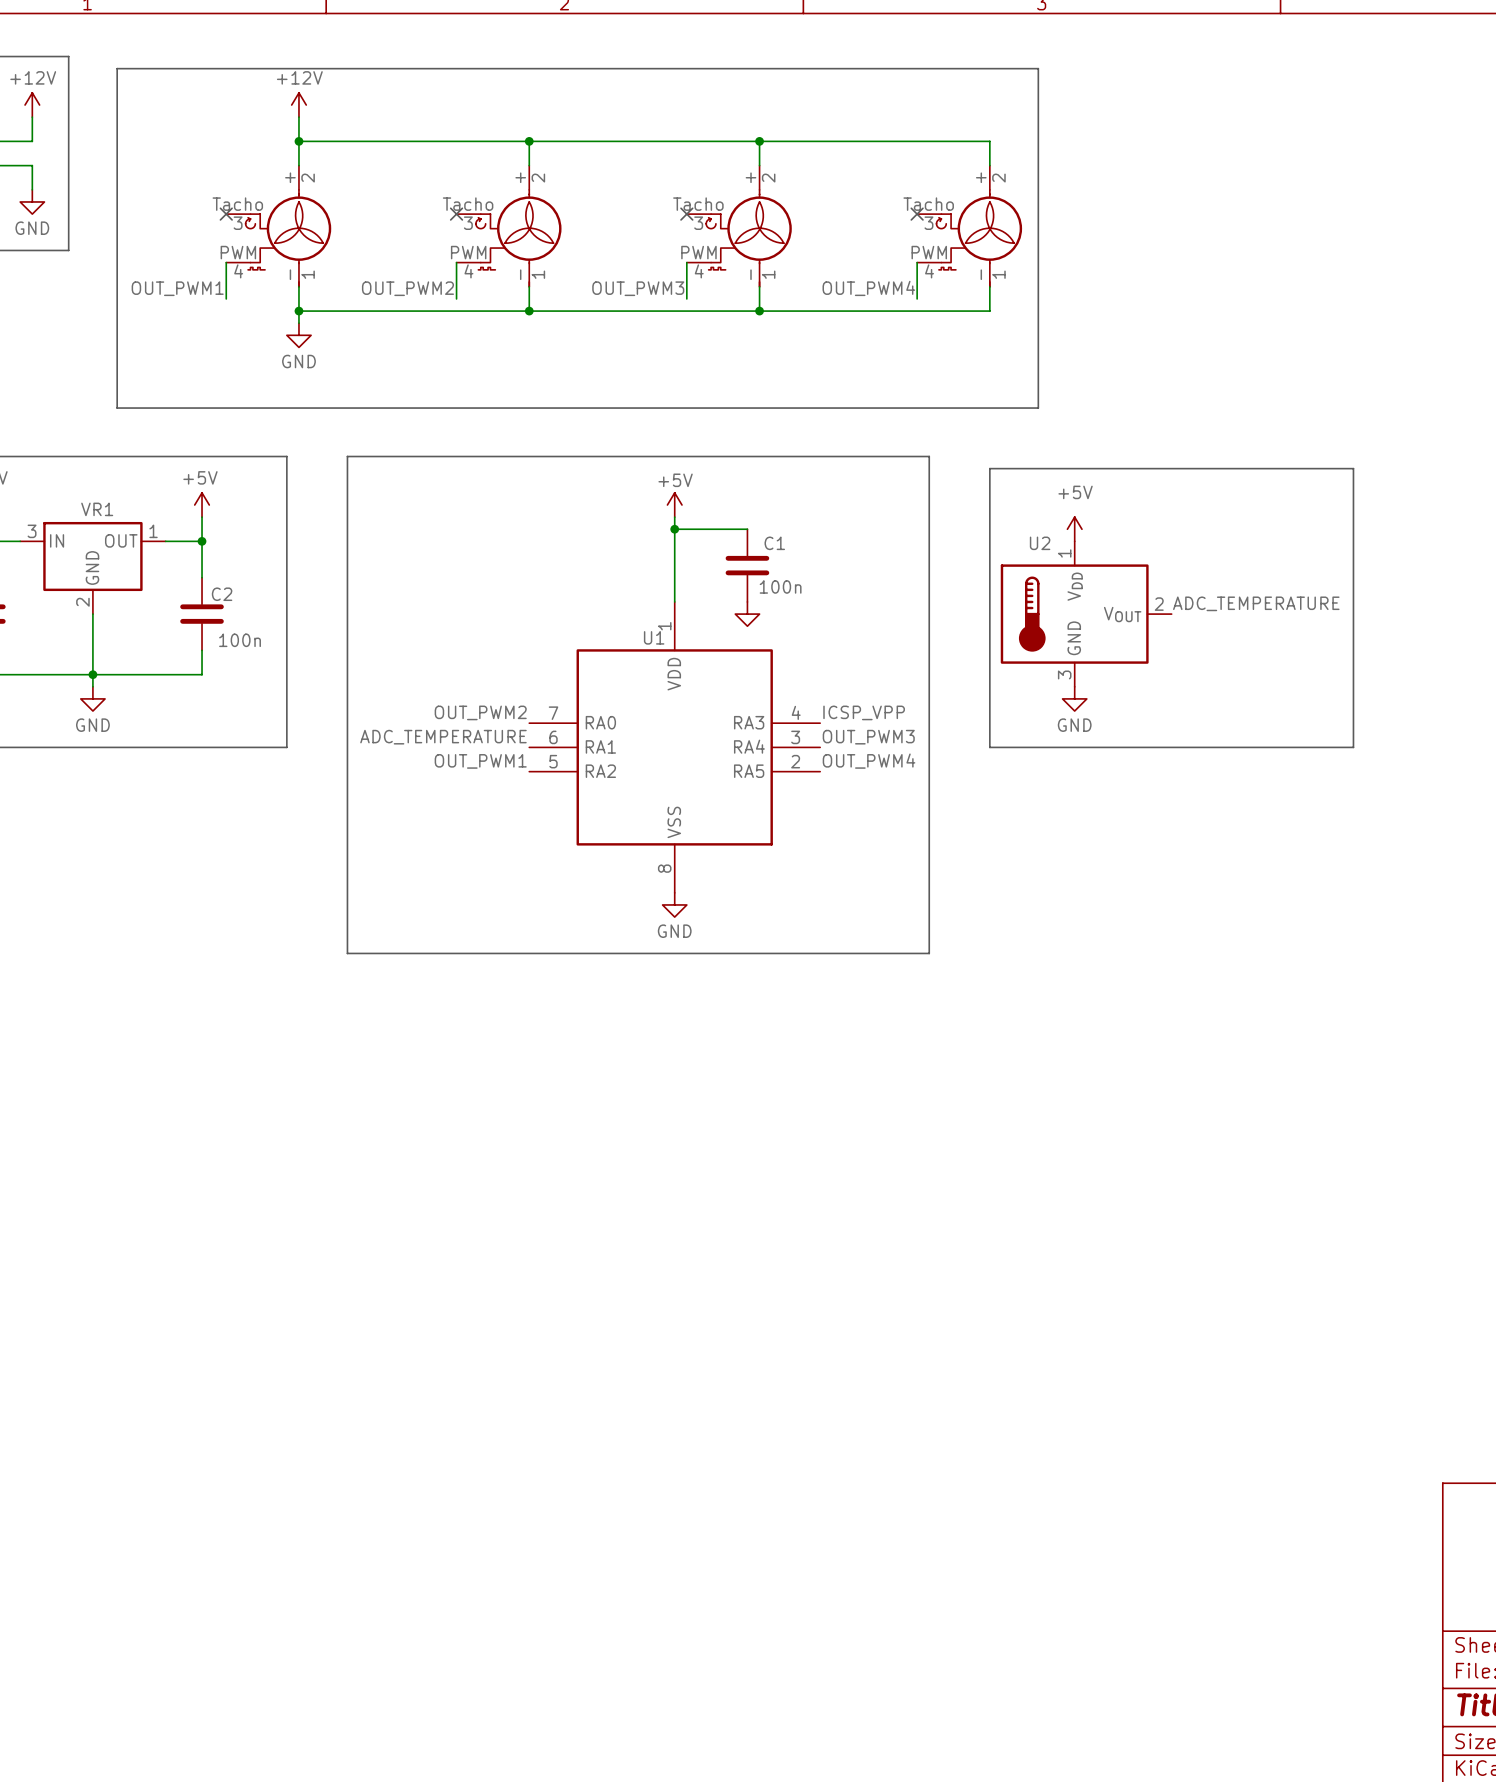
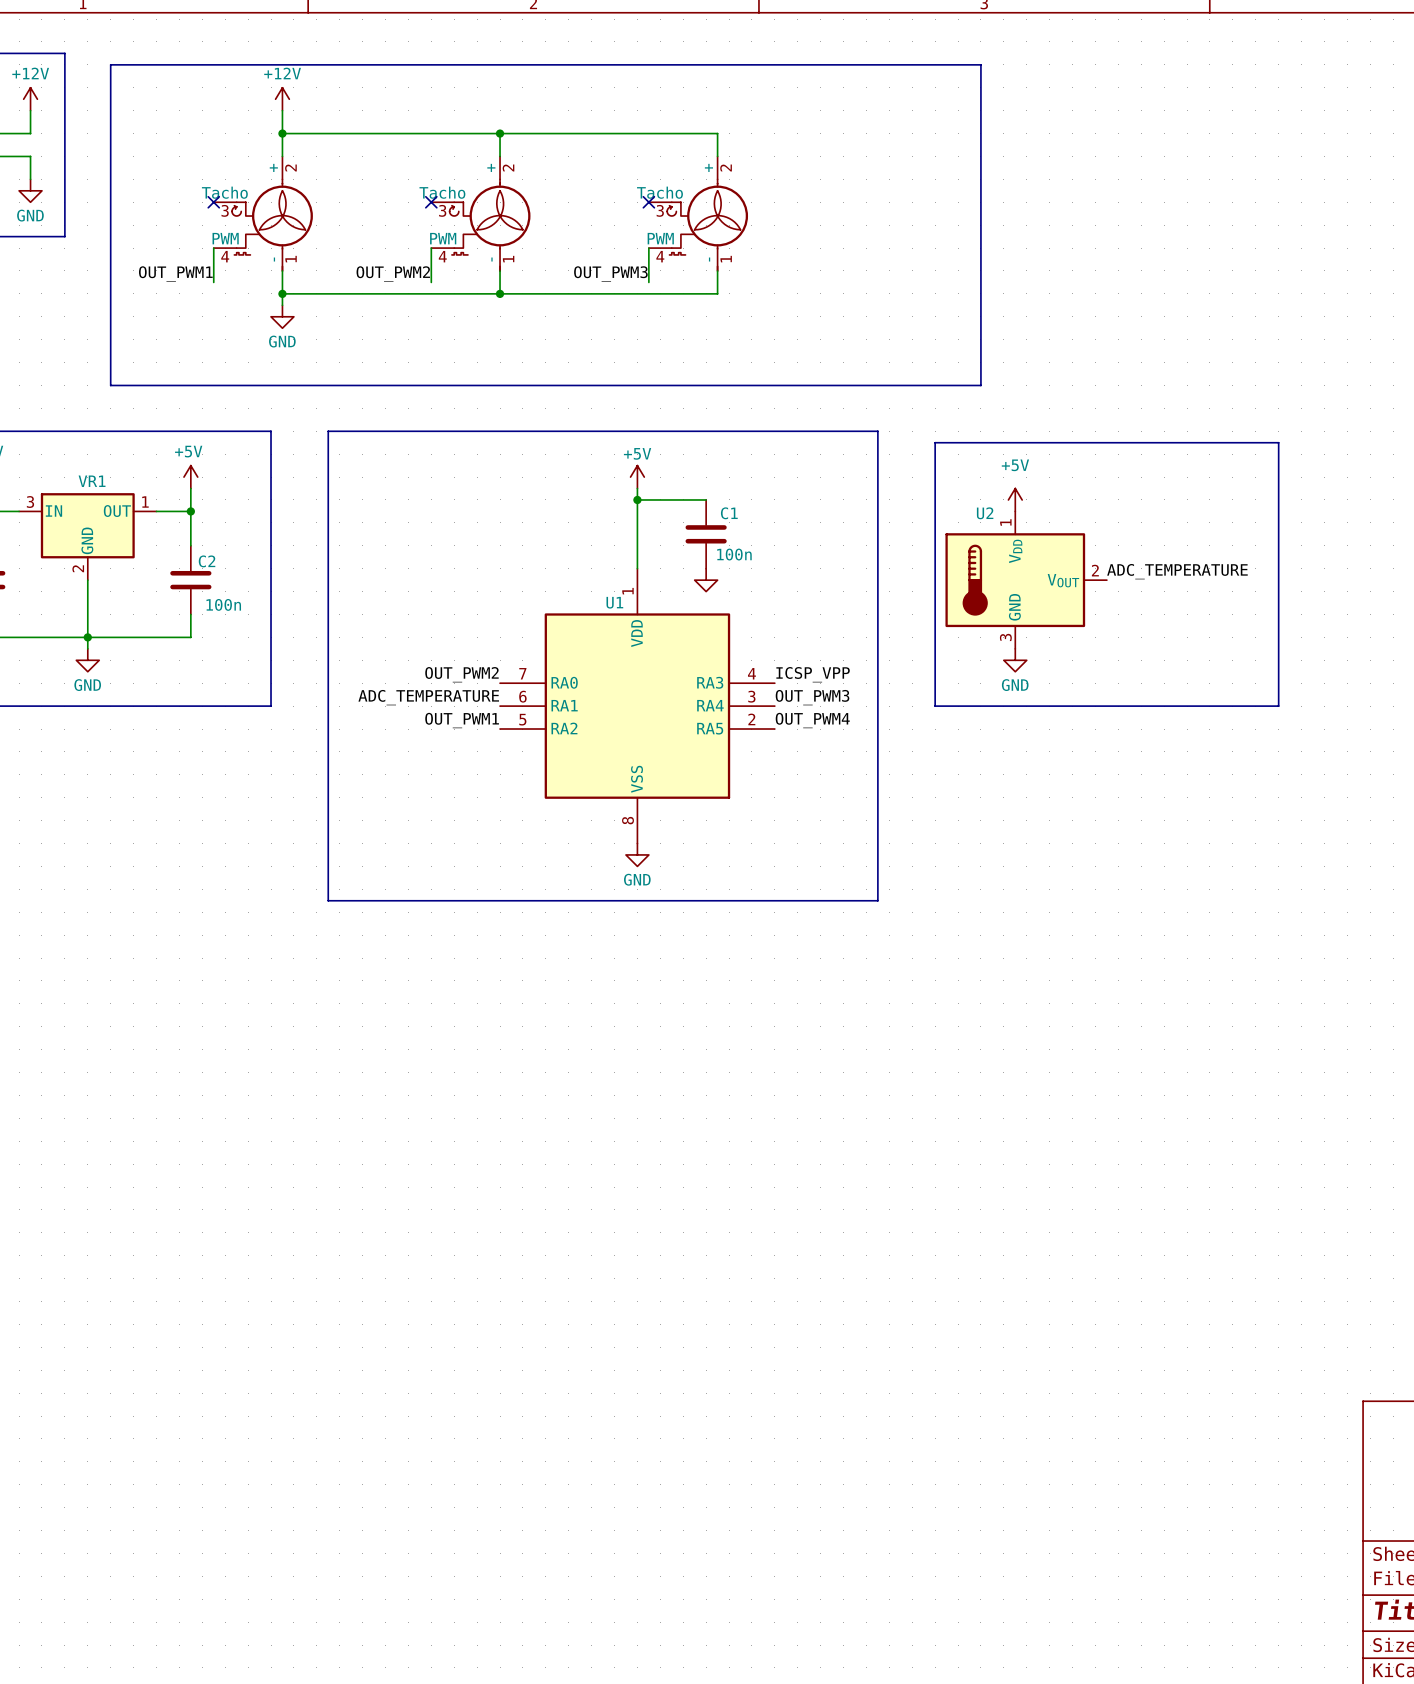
wire: (759, 141) (989, 141) (989, 165) -> none
junction: (759, 141) -> none
no-connect mark: (917, 214) -> none
part: (969, 226) -> none
wire: (917, 262) (917, 298) -> none
wire: (989, 286) (989, 311) (759, 311) -> none
label: OUT_PWM4 (868, 288) -> none
junction: (759, 311) -> none

